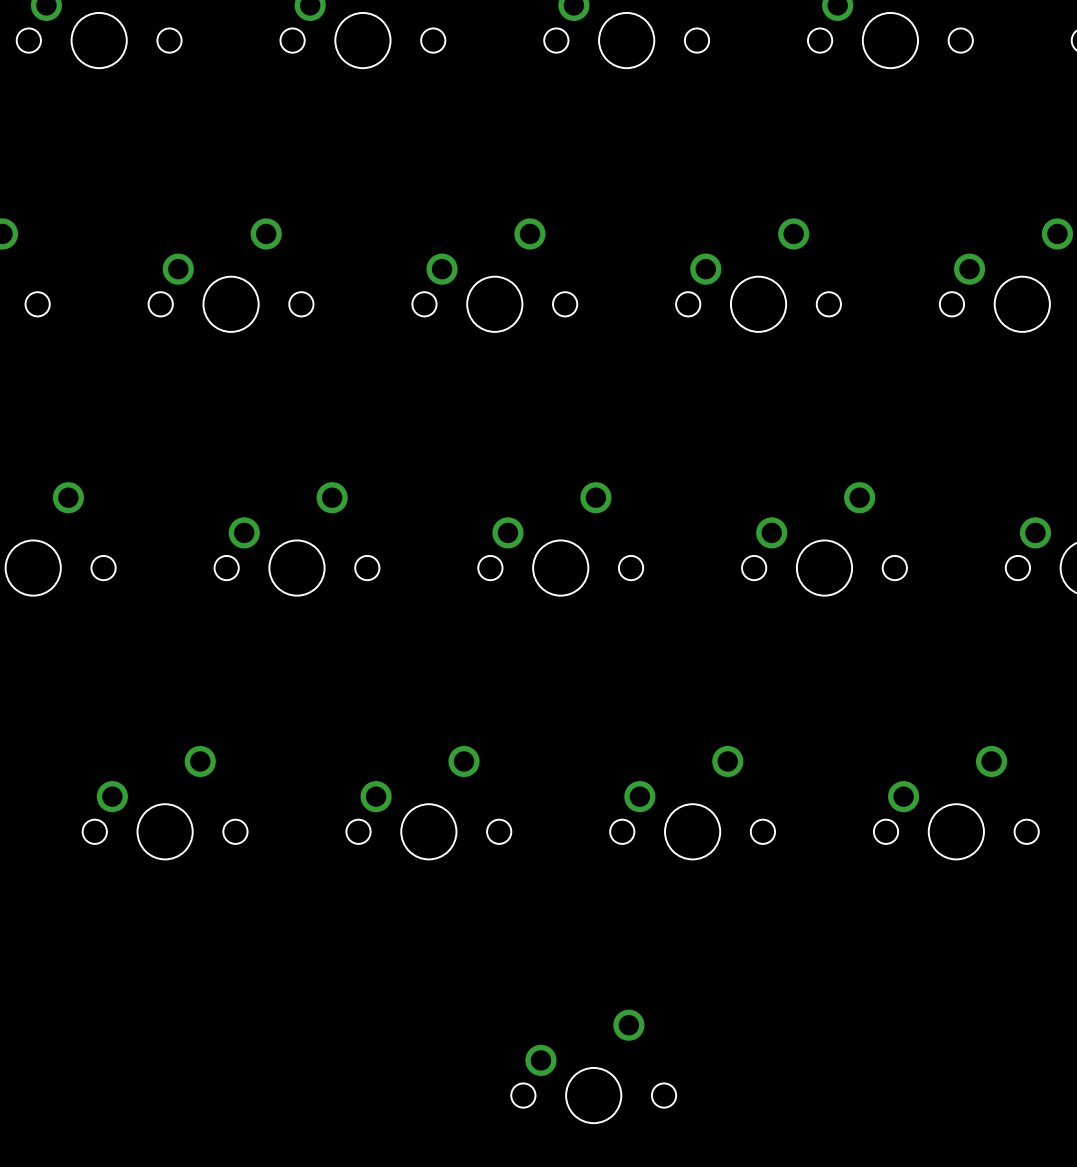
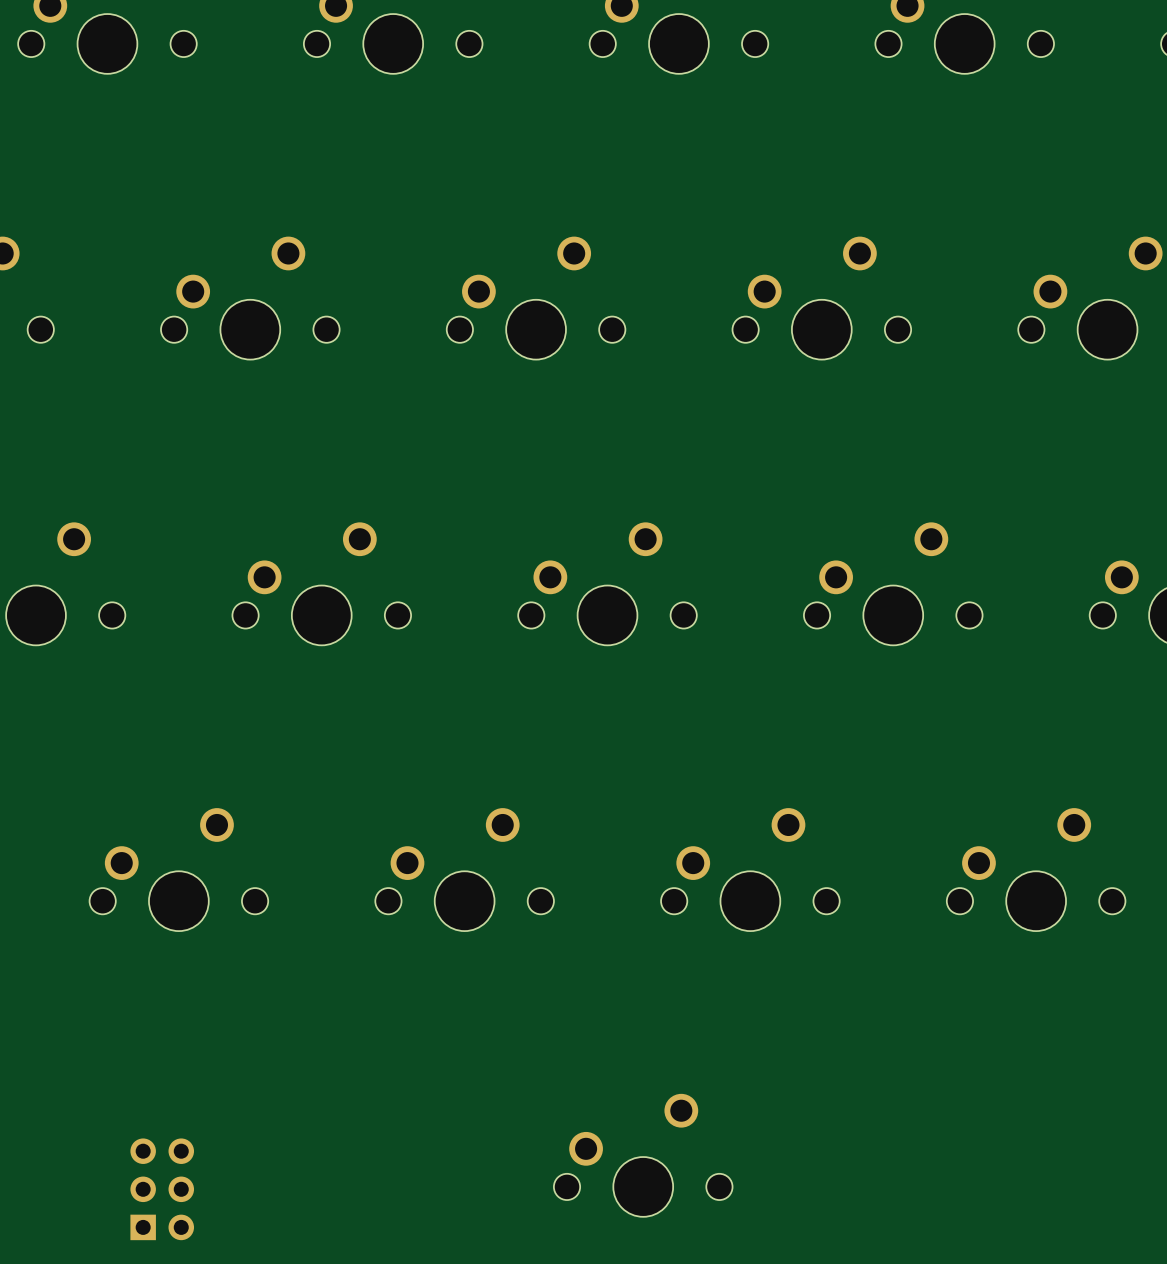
part: none -> (162, 1189)

